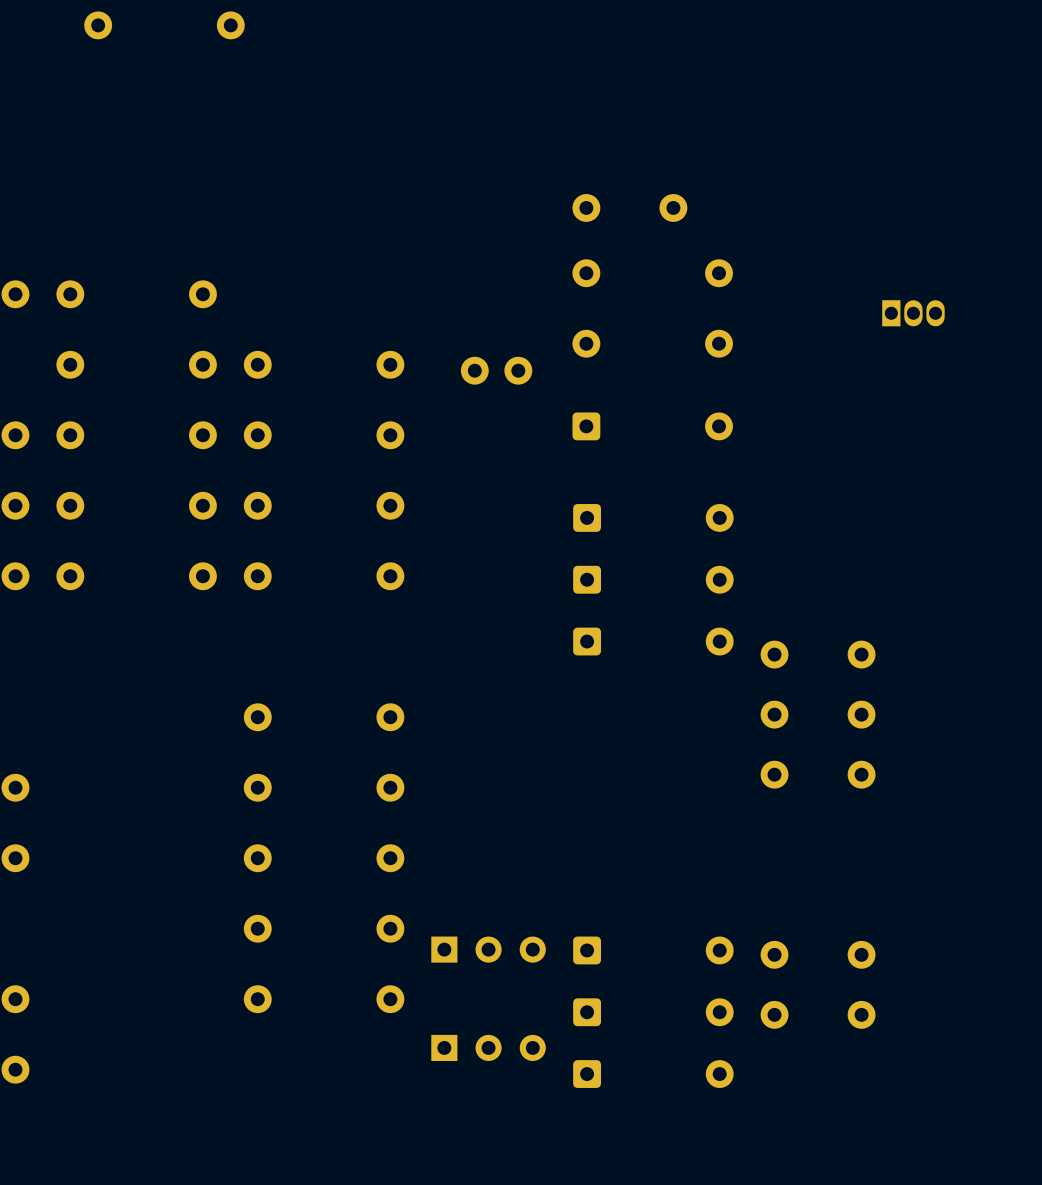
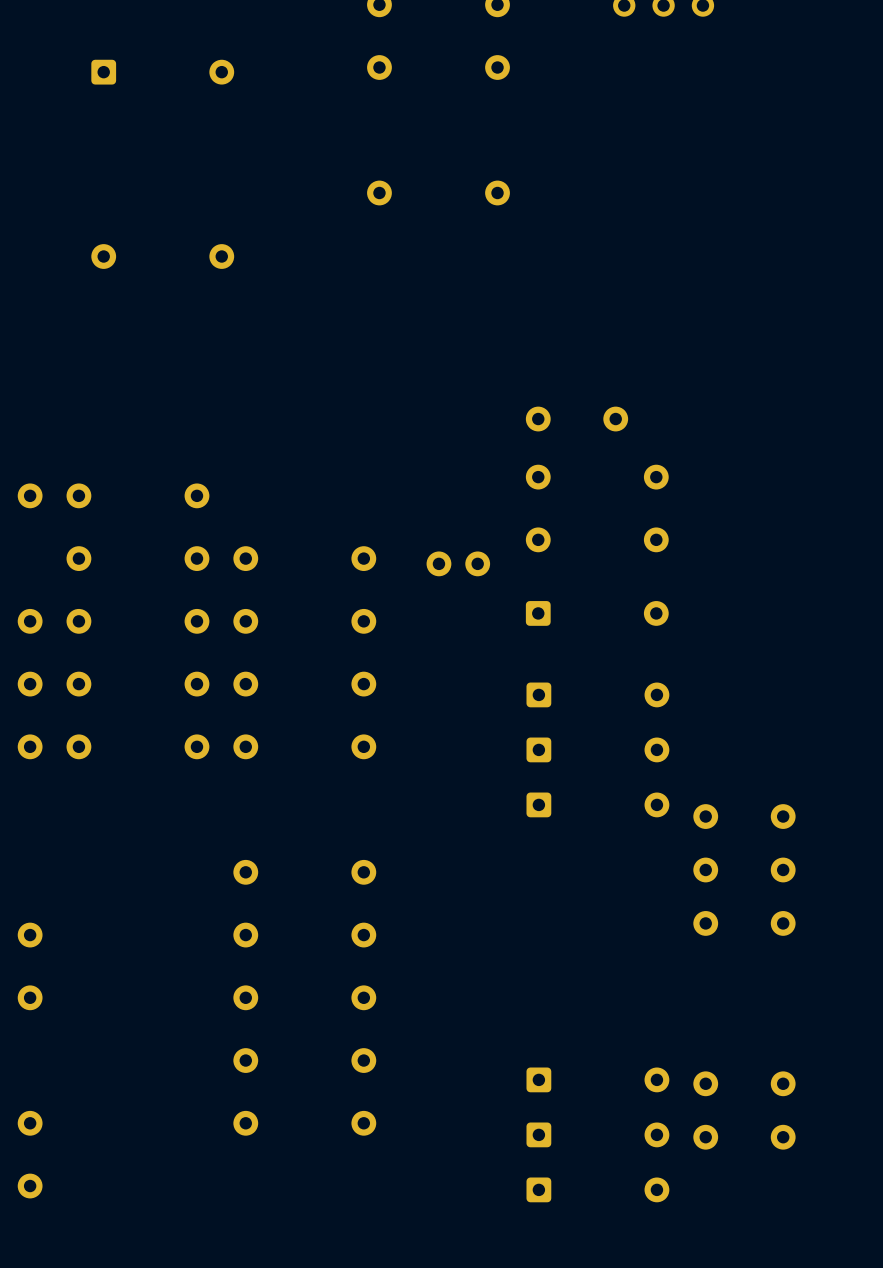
part: (913, 313) -> none
part: (488, 949) -> none
part: (488, 1047) -> none

